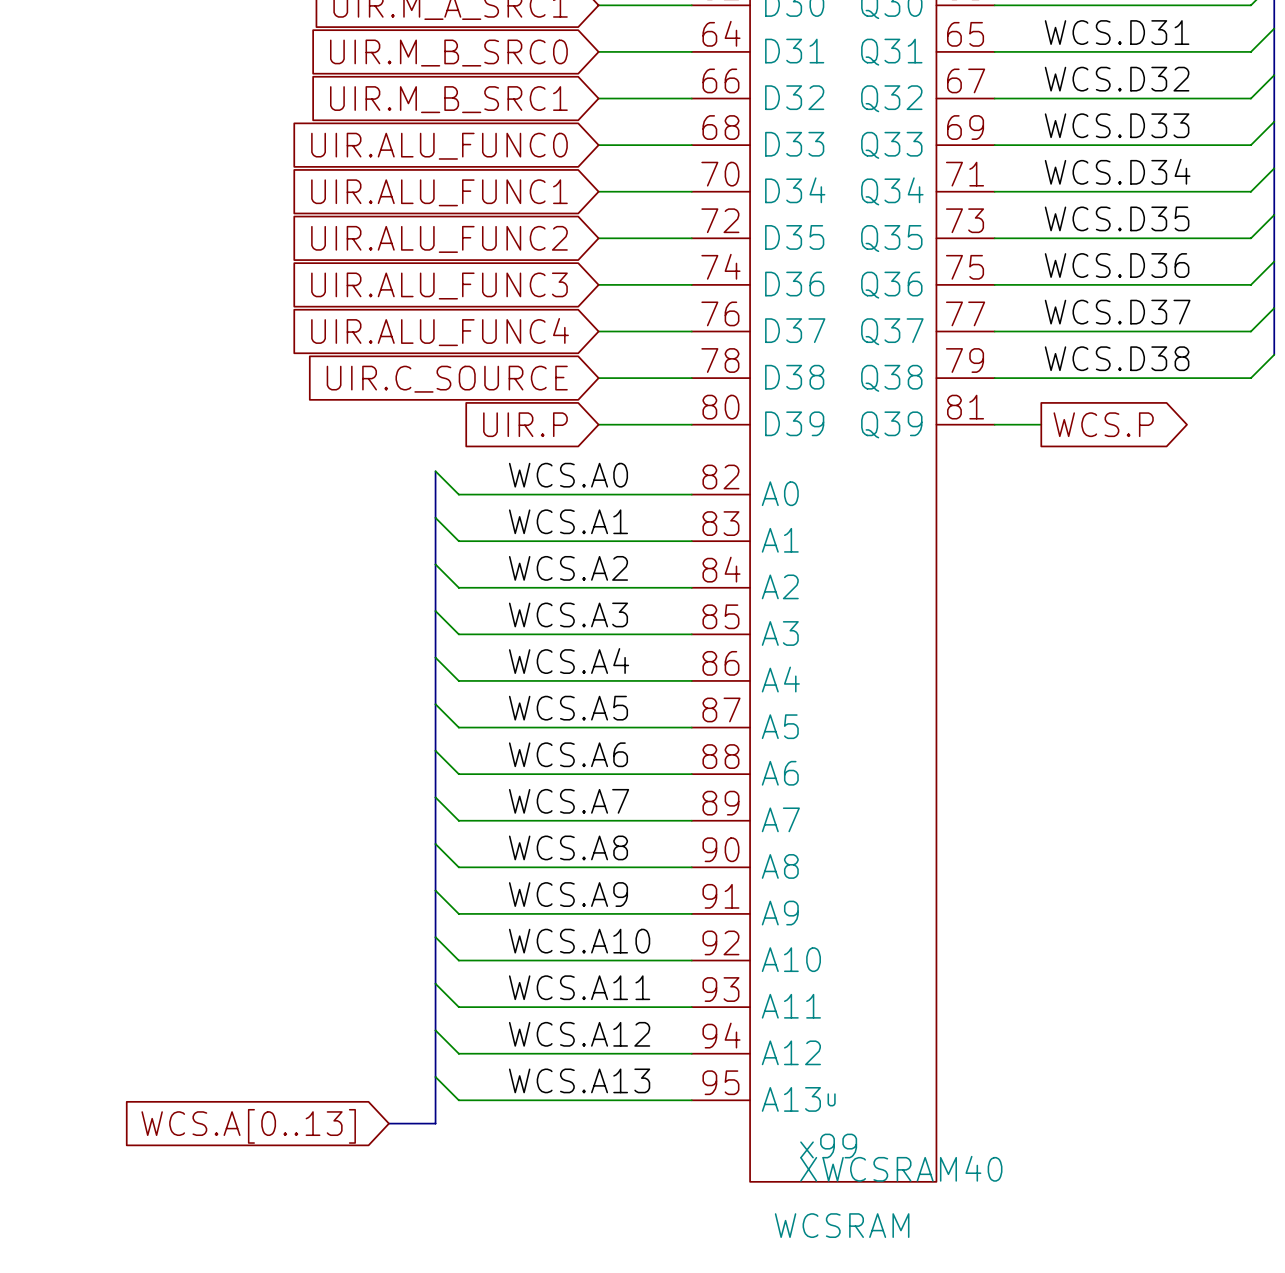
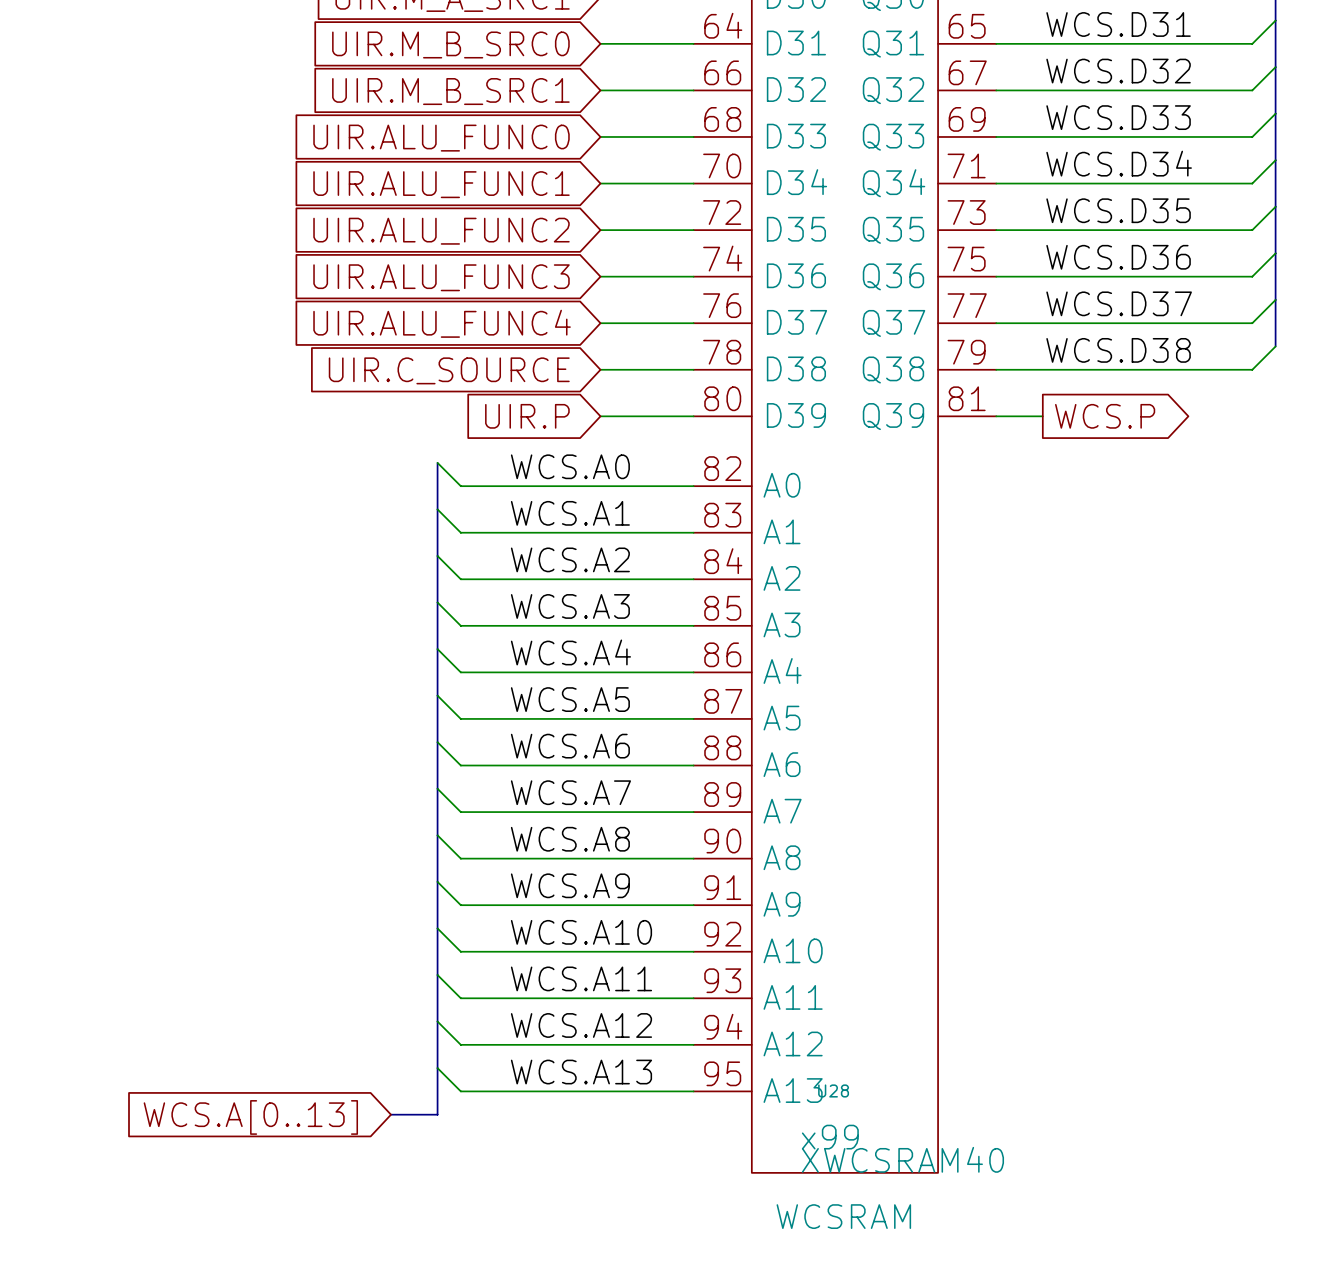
U name: U (831, 1099) -> U28 (833, 1090)

